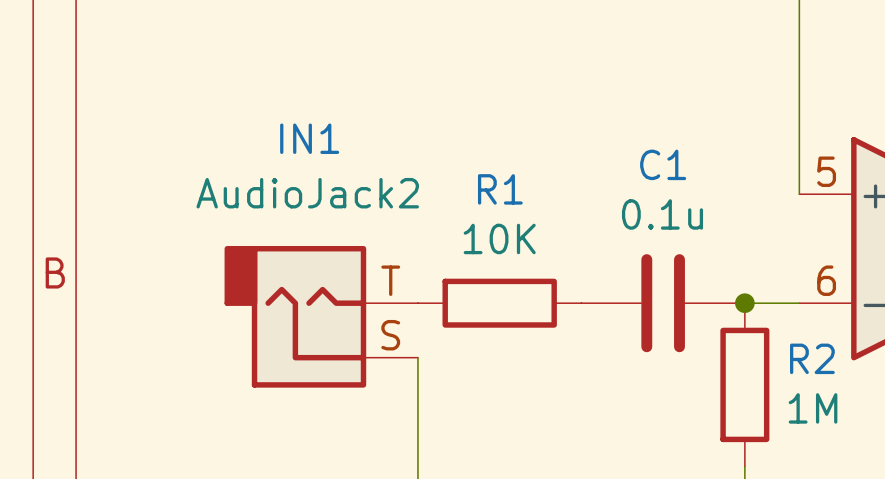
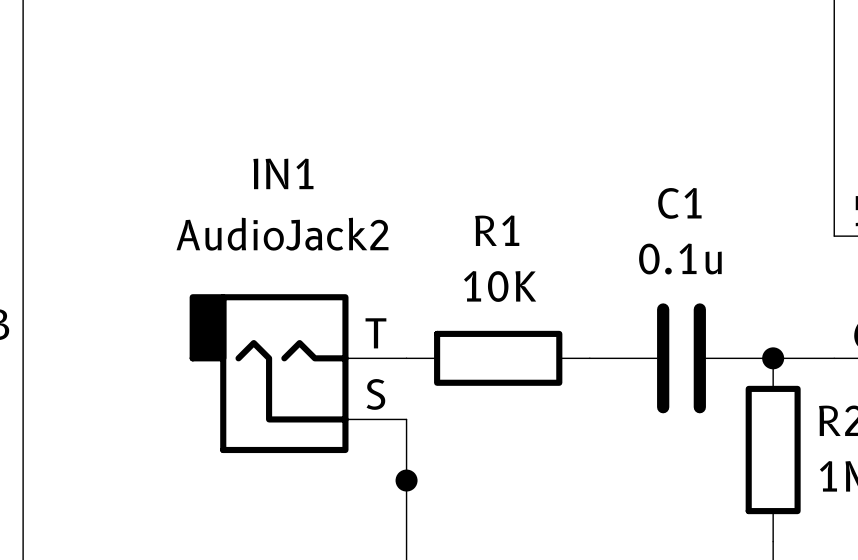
junction: none -> (406, 480)

